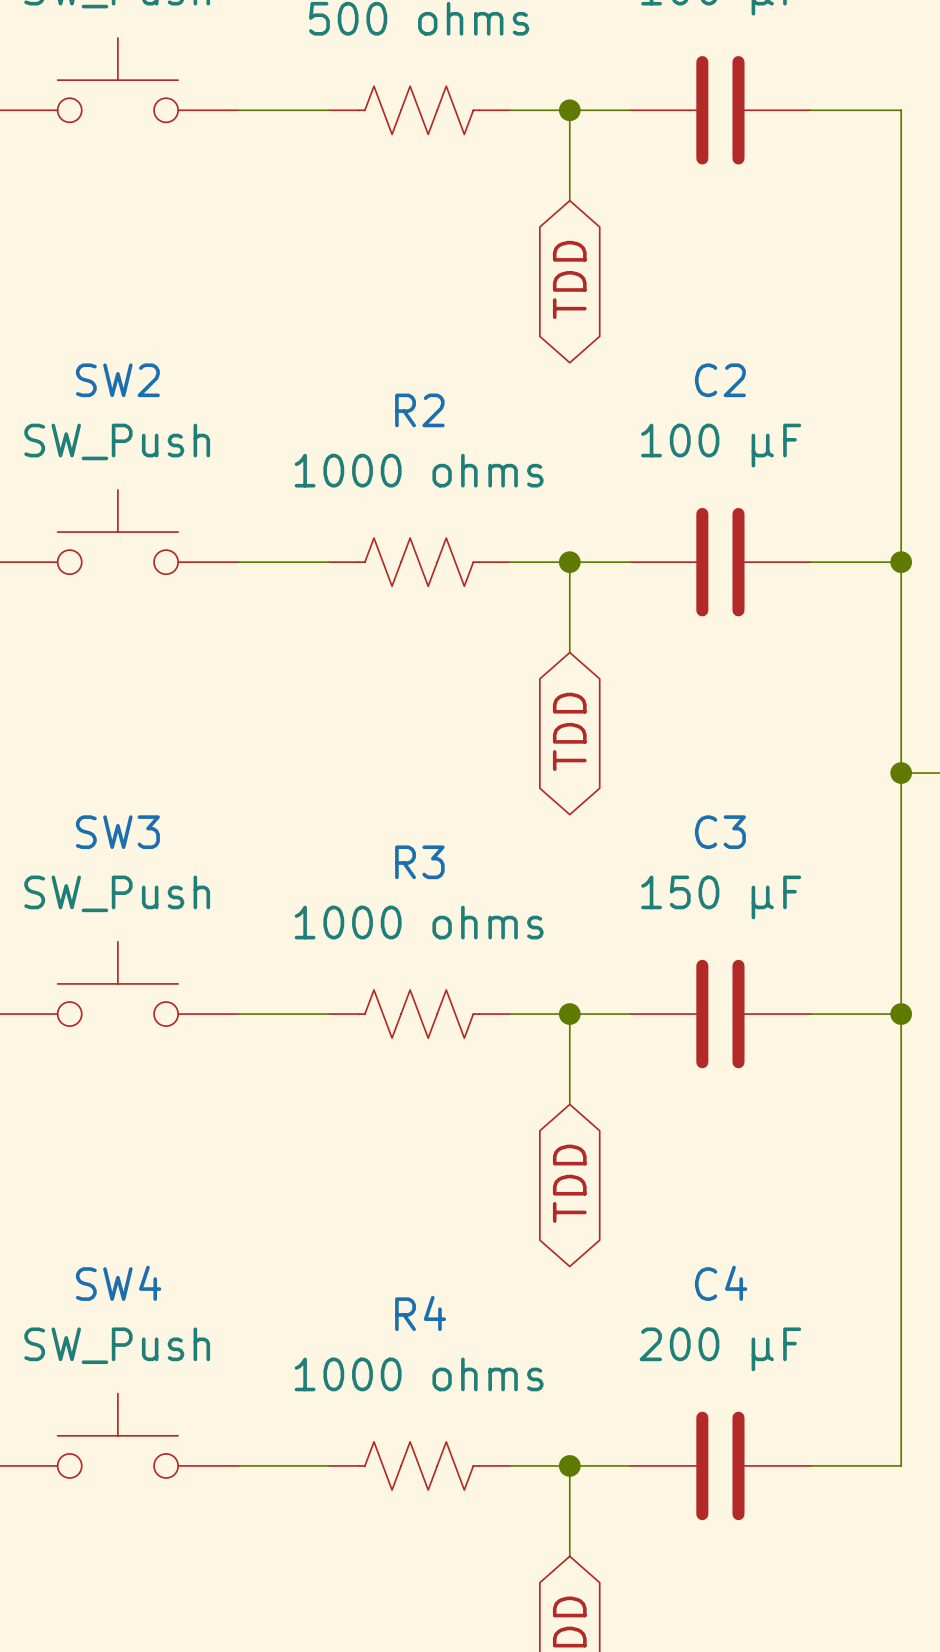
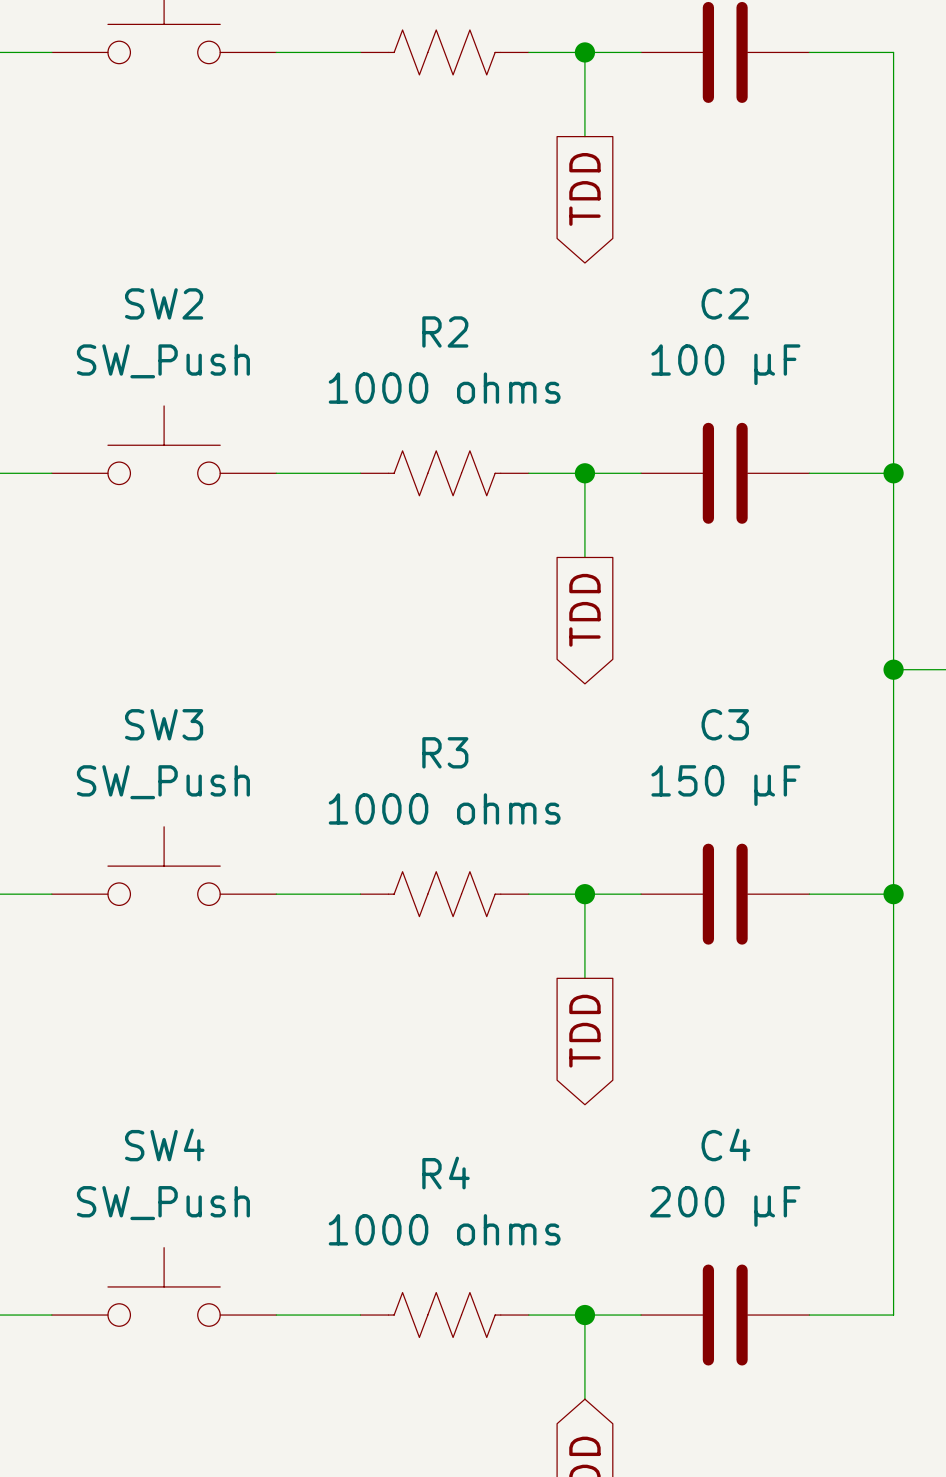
global label shape: bidirectional (569, 279) -> output (584, 189)
global label shape: bidirectional (569, 731) -> output (584, 610)
global label shape: bidirectional (569, 1183) -> output (584, 1031)

